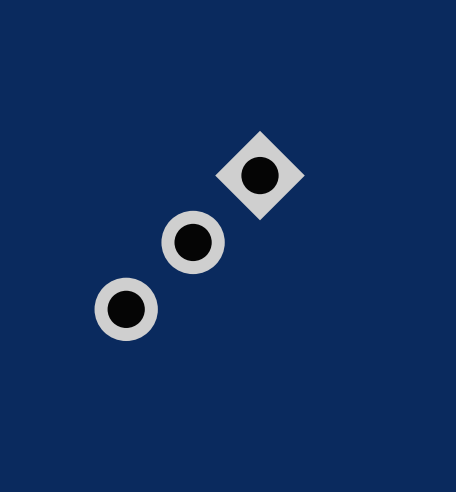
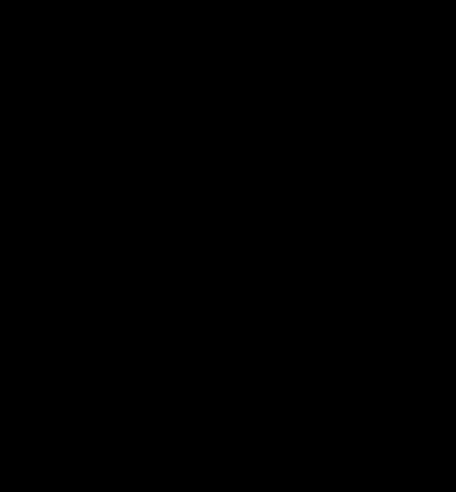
part: (199, 235) -> none

